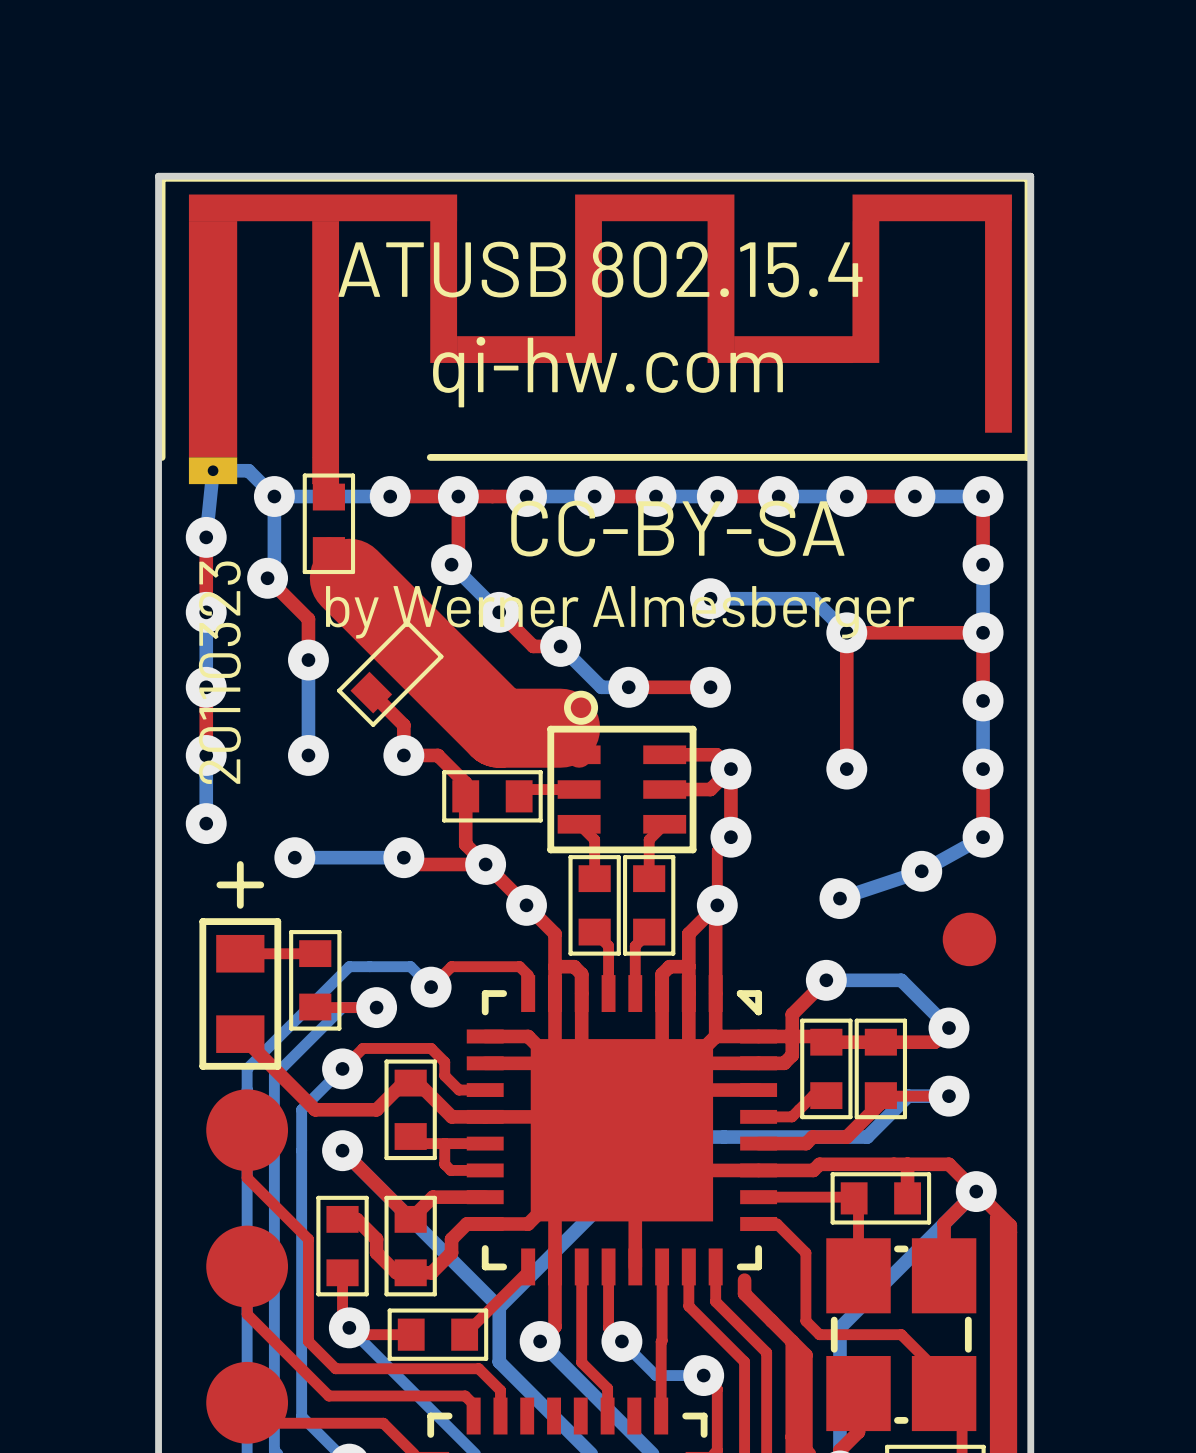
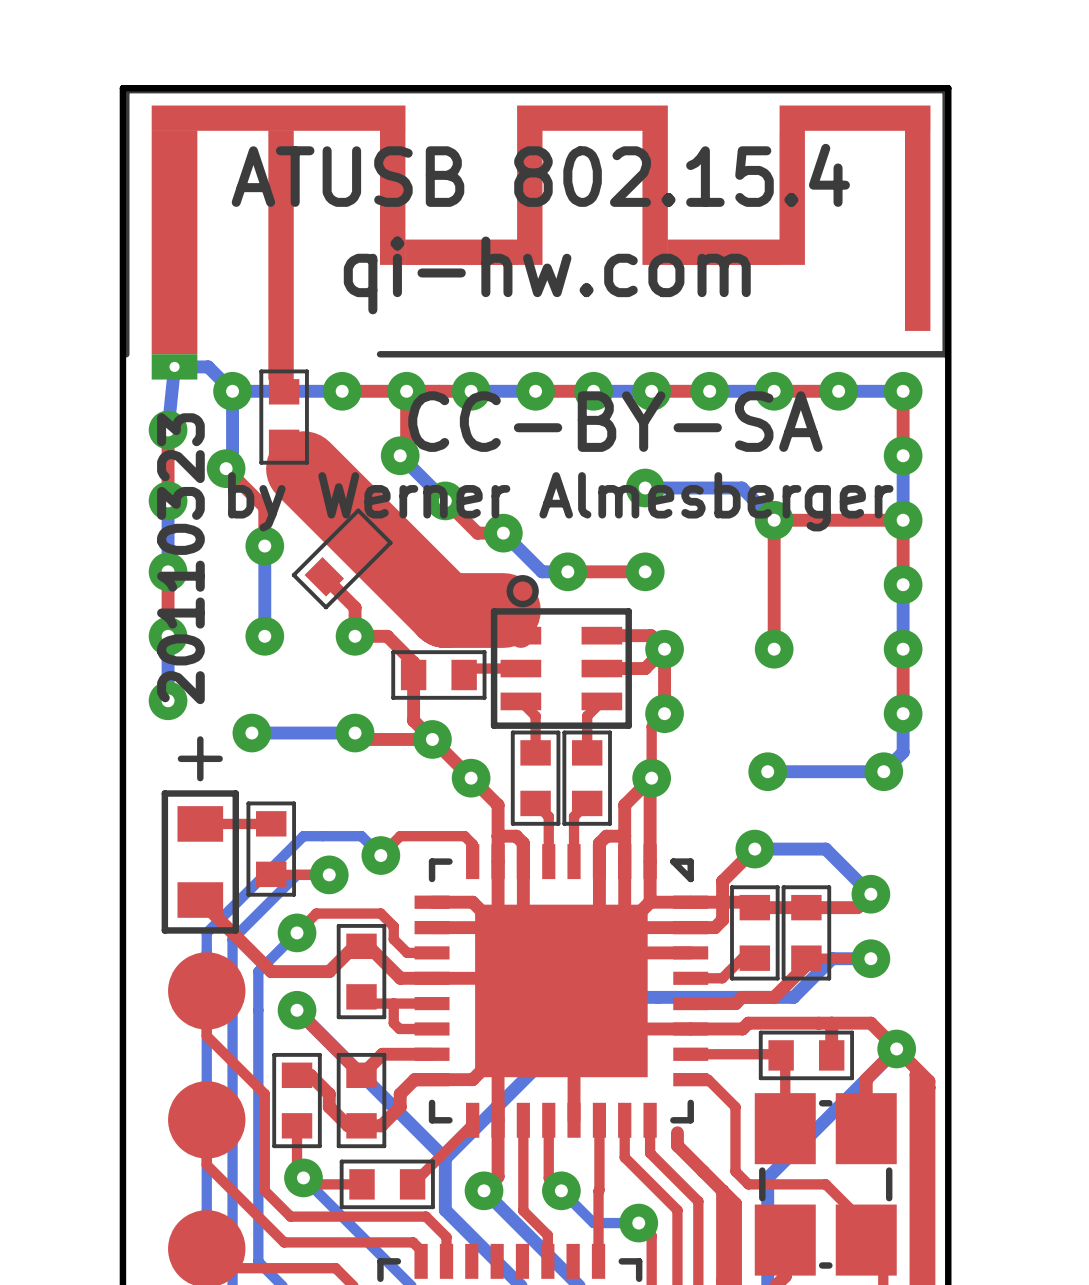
bottom track: (983, 837) (921, 871) (839, 898) -> (903, 713) (903, 752) (883, 771) (767, 771)
via position: (921, 871) -> (883, 771)
part: (969, 939) -> none

